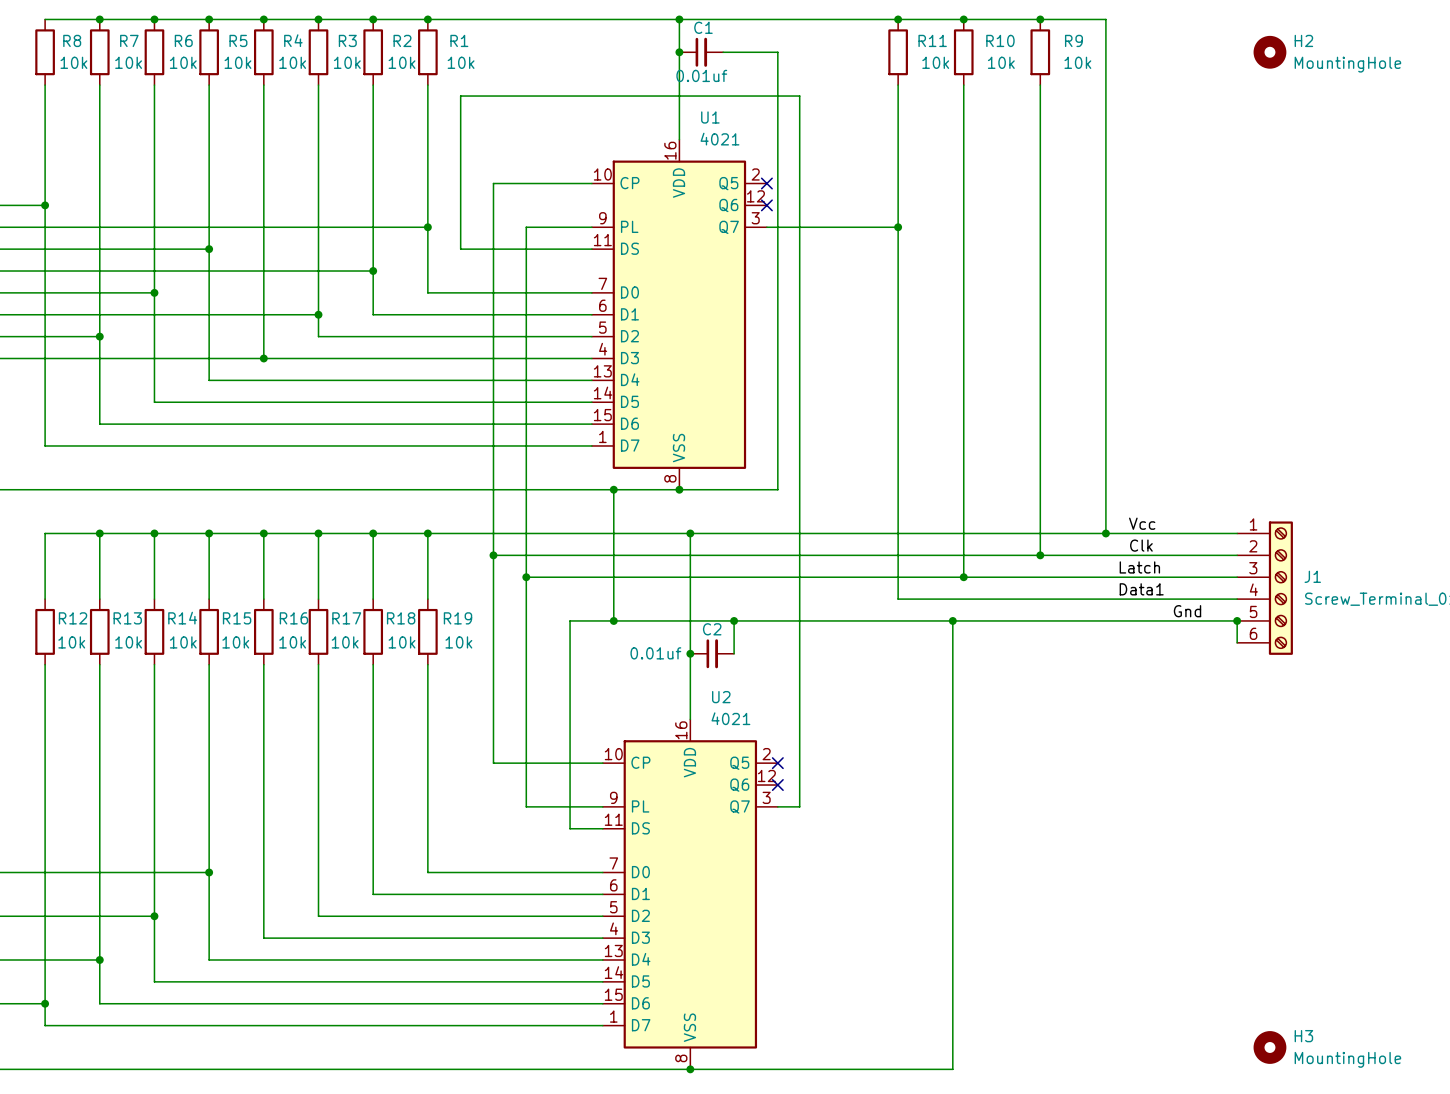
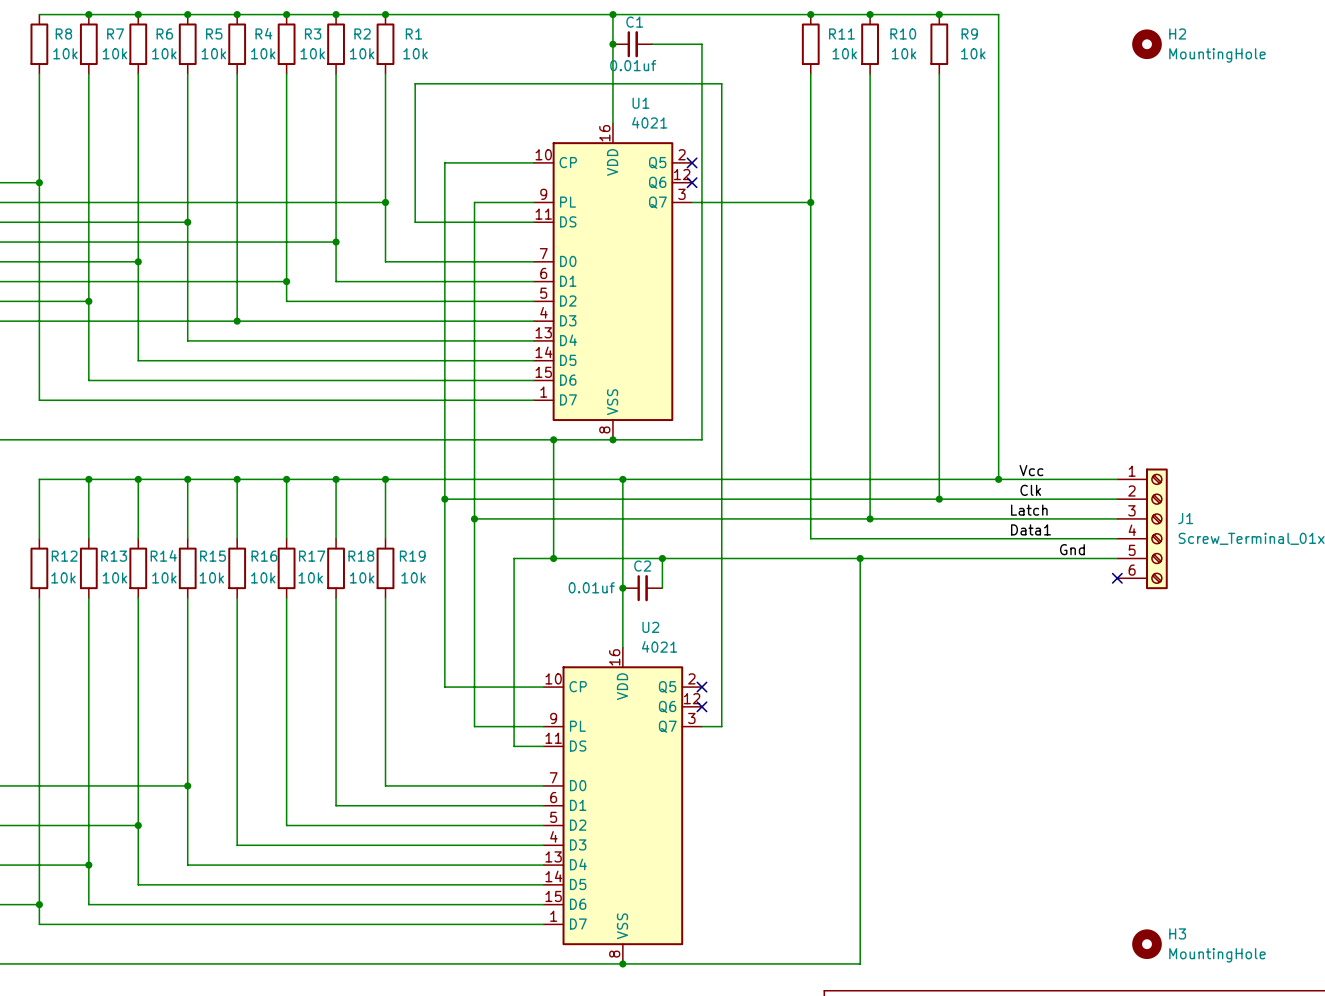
wire: (1237, 620) (1237, 642) -> none
junction: (1237, 620) -> none
no-connect mark: none -> (1117, 578)

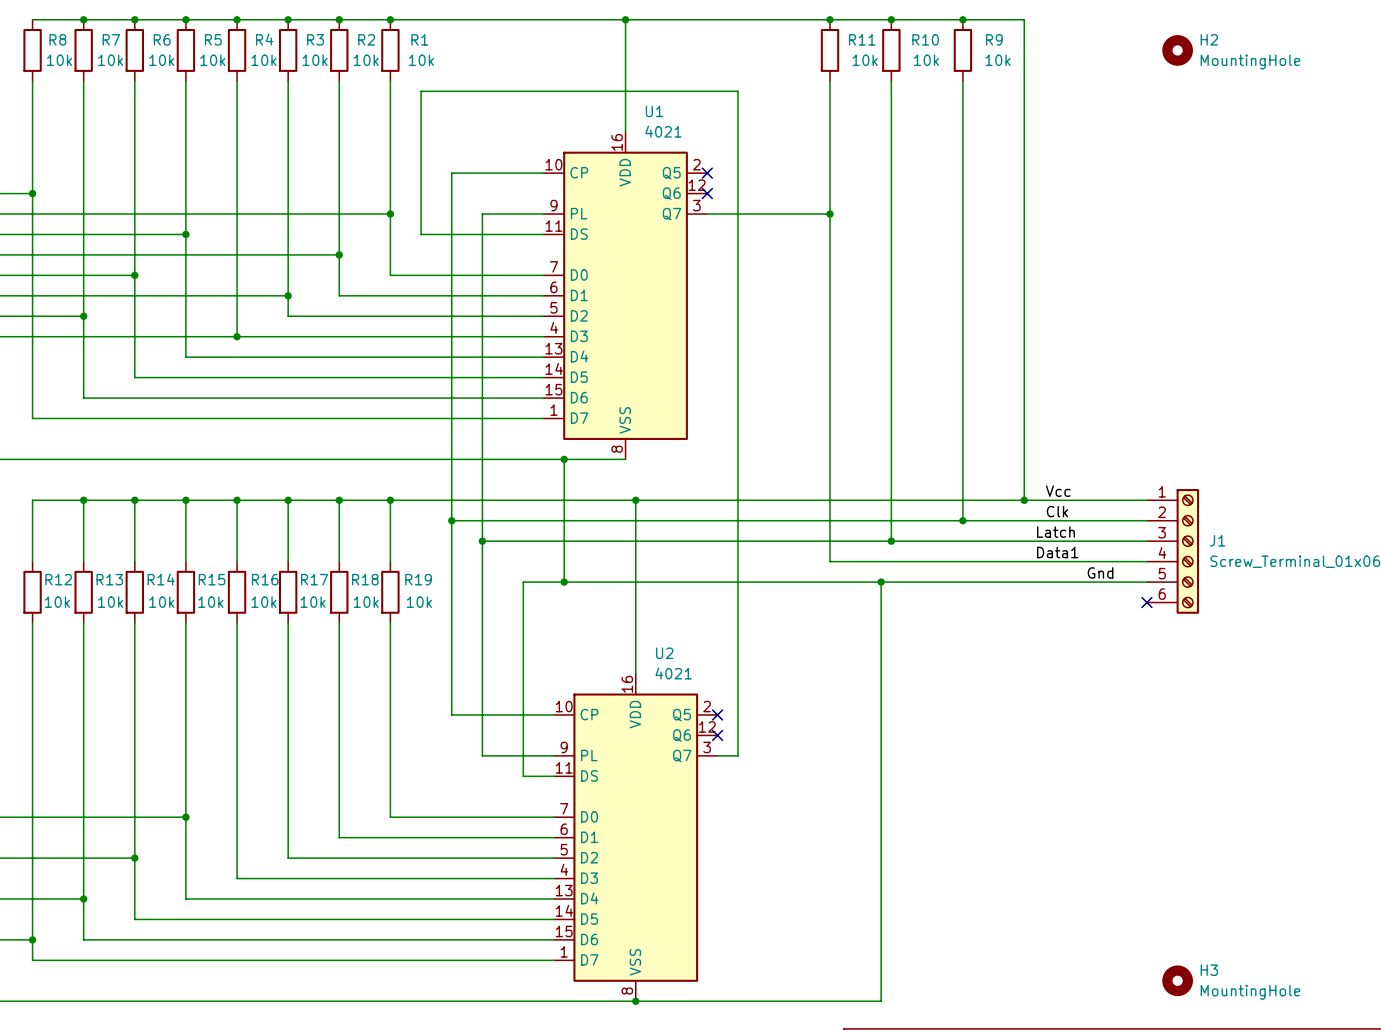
junction: (612, 44) -> none
C1: 0.01uf (632, 44) -> none
wire: (652, 44) (701, 44) (701, 439) (612, 439) -> none
junction: (612, 439) -> none
wire: (662, 558) (662, 588) -> none
junction: (662, 558) -> none
junction: (622, 588) -> none
C2: 0.01uf (642, 588) -> none

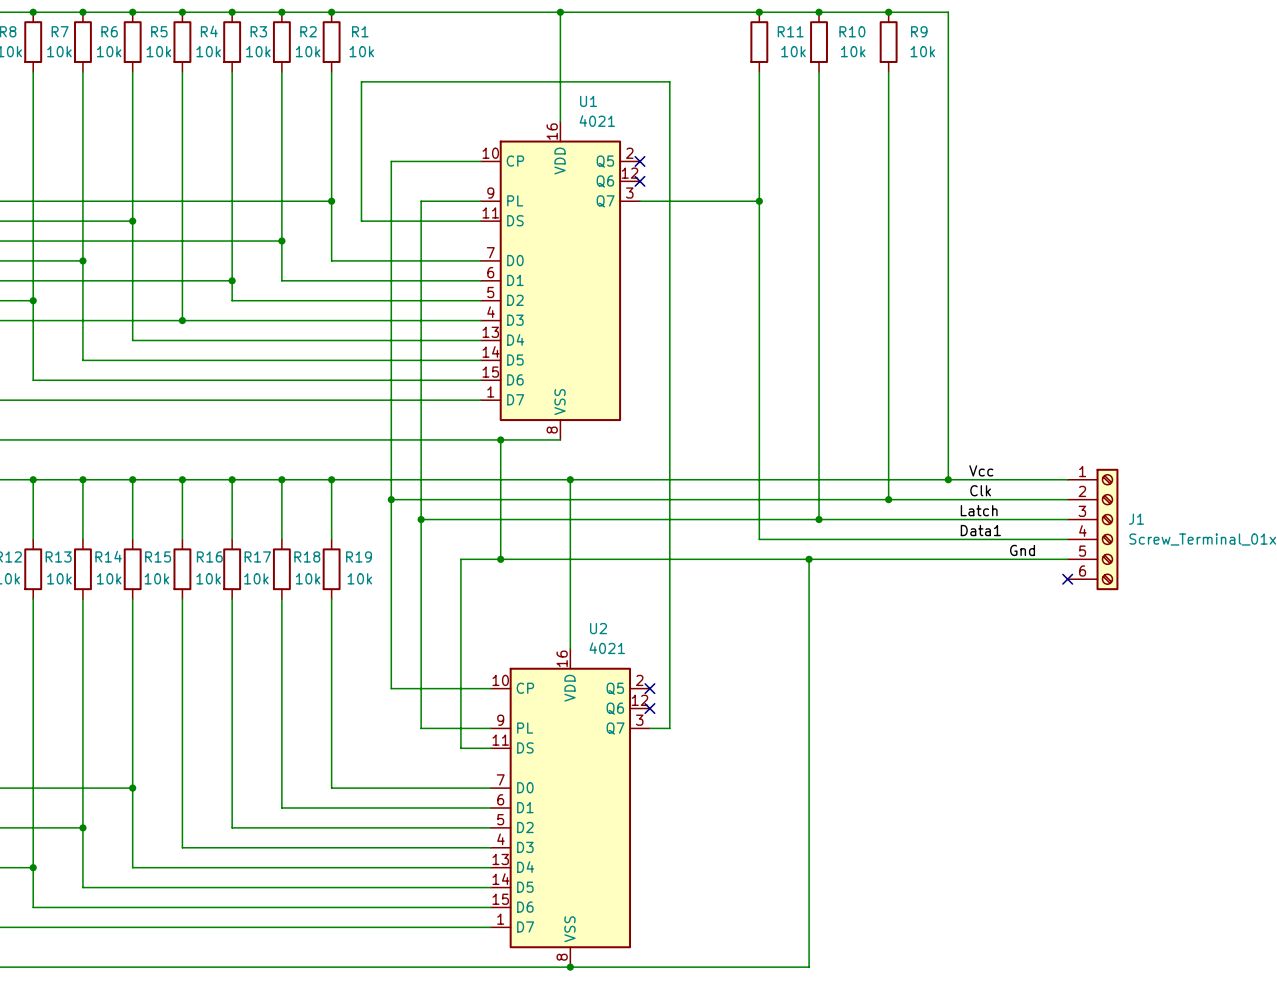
H2: MountingHole (1177, 50) -> none
H3: MountingHole (1177, 980) -> none

